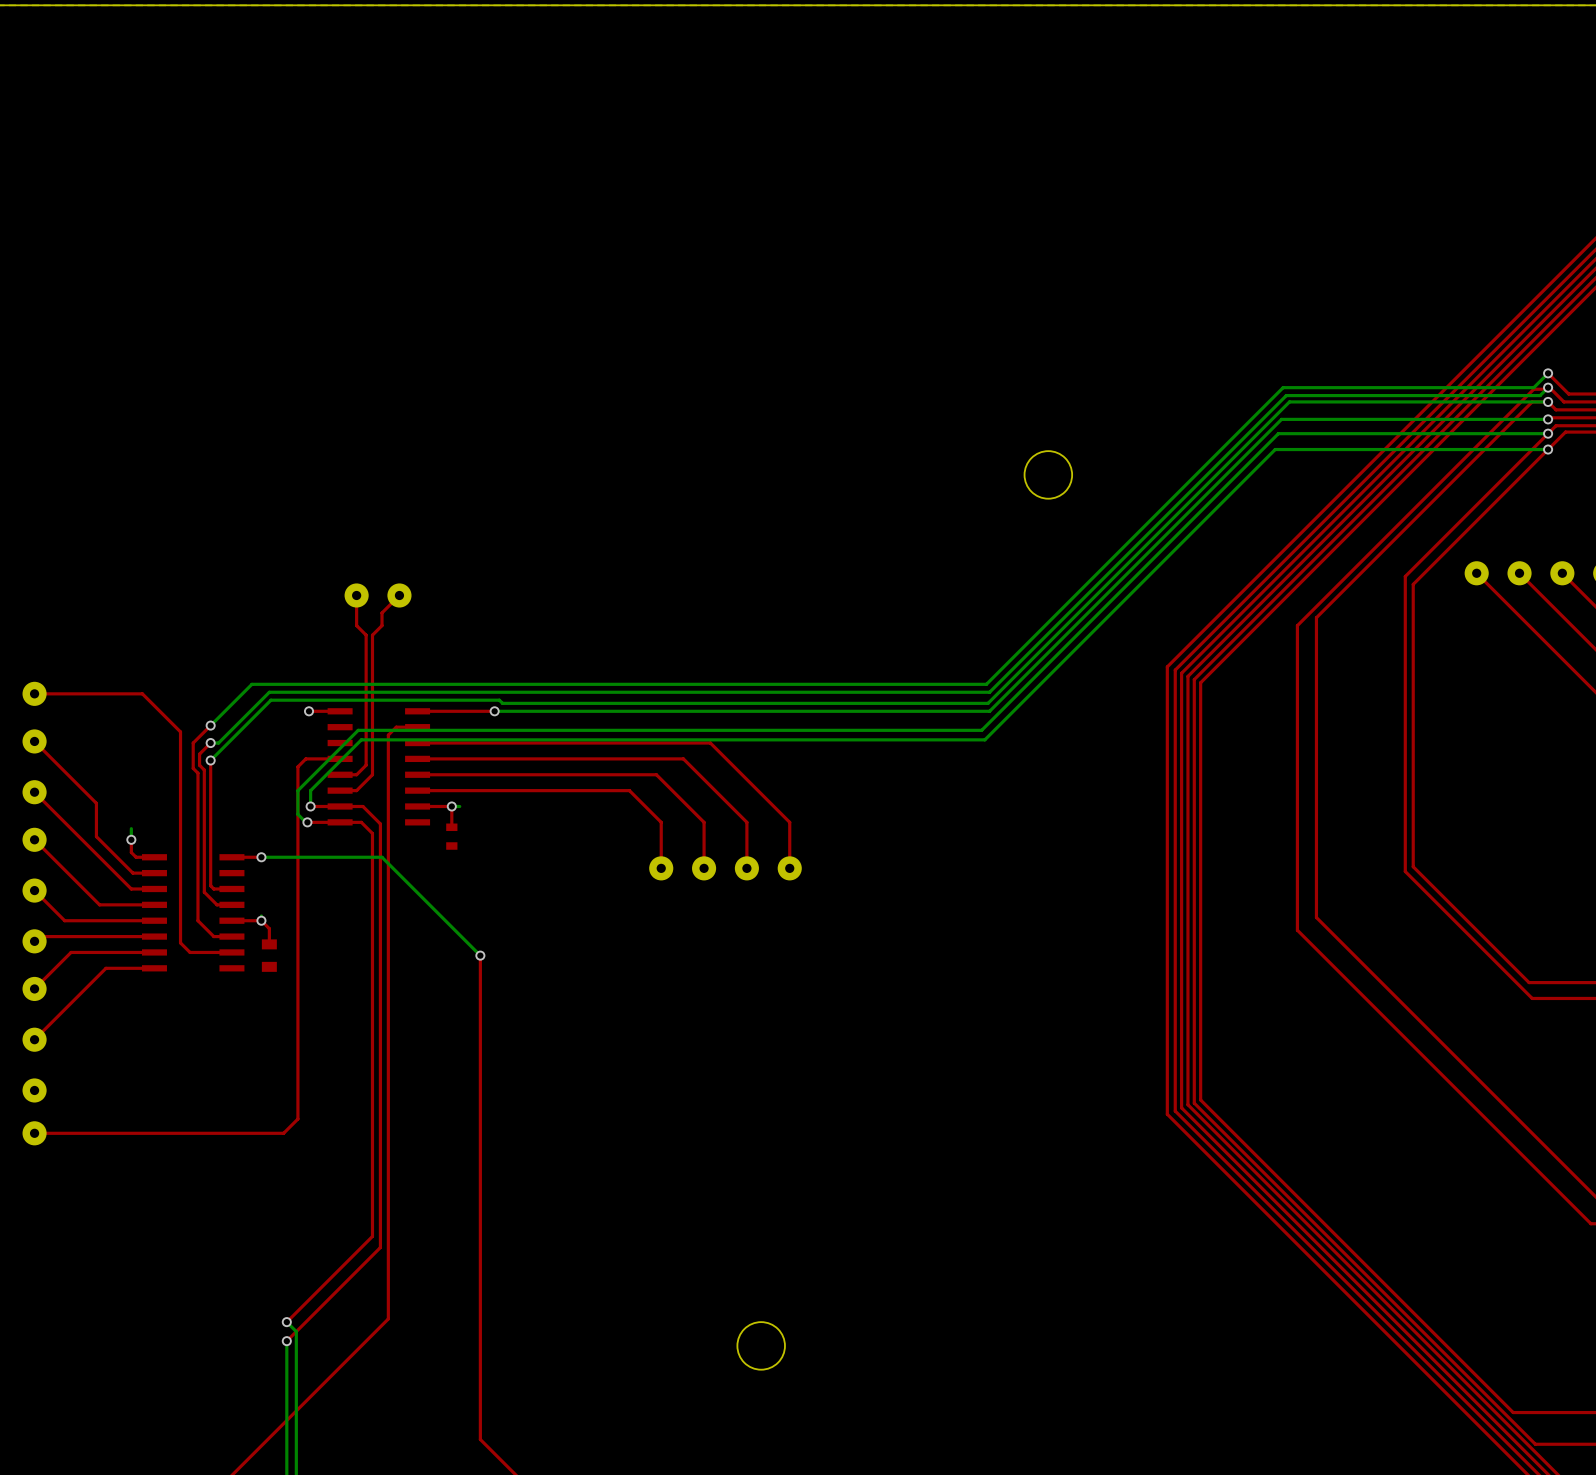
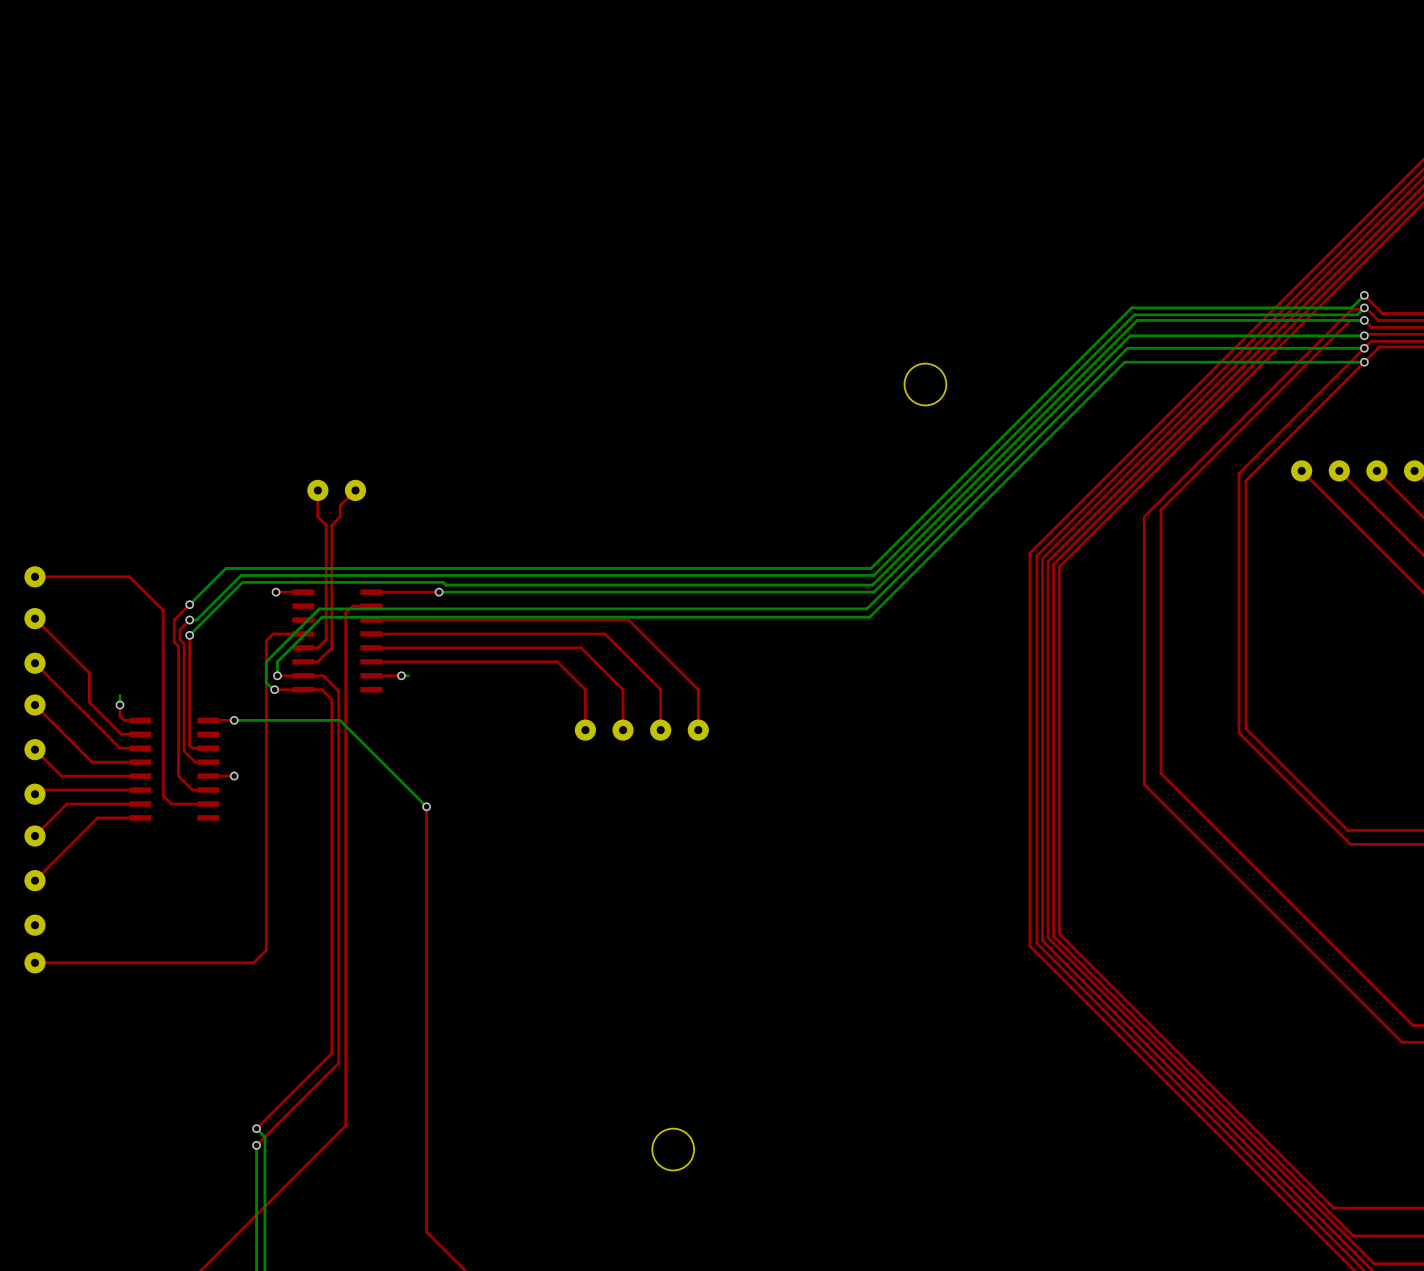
top track: (451, 806) (451, 827) -> none
part: (451, 836) -> none
top track: (261, 920) (269, 928) (269, 944) -> none
part: (269, 955) -> none

